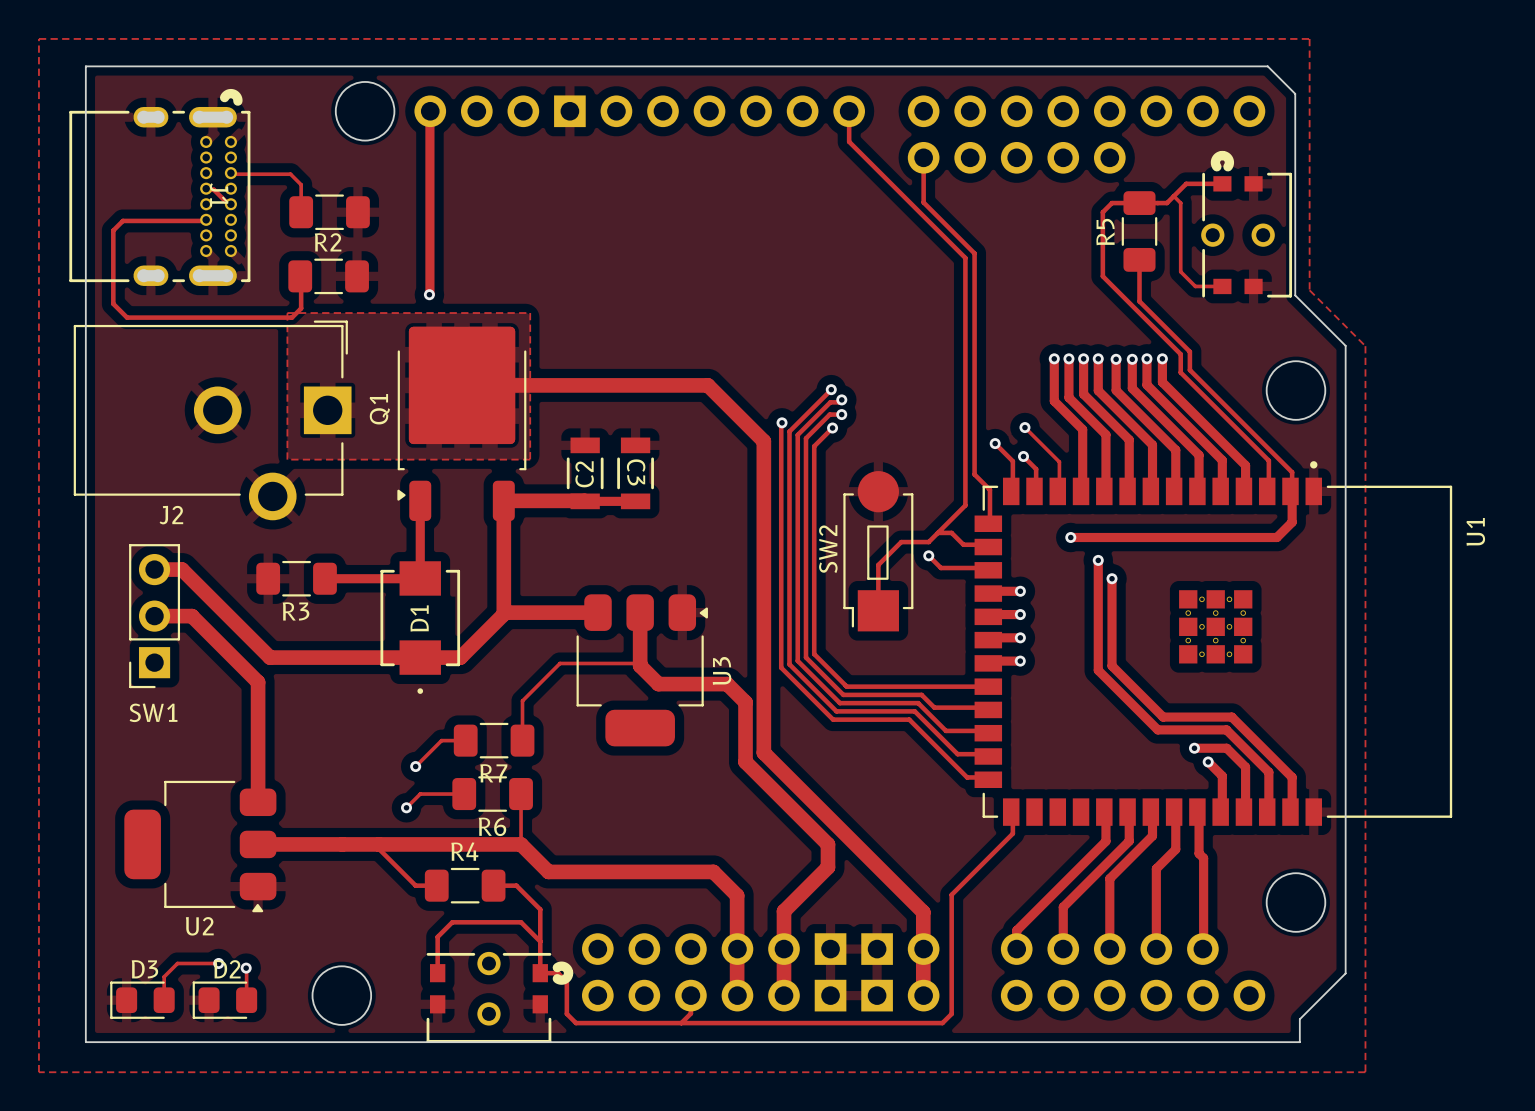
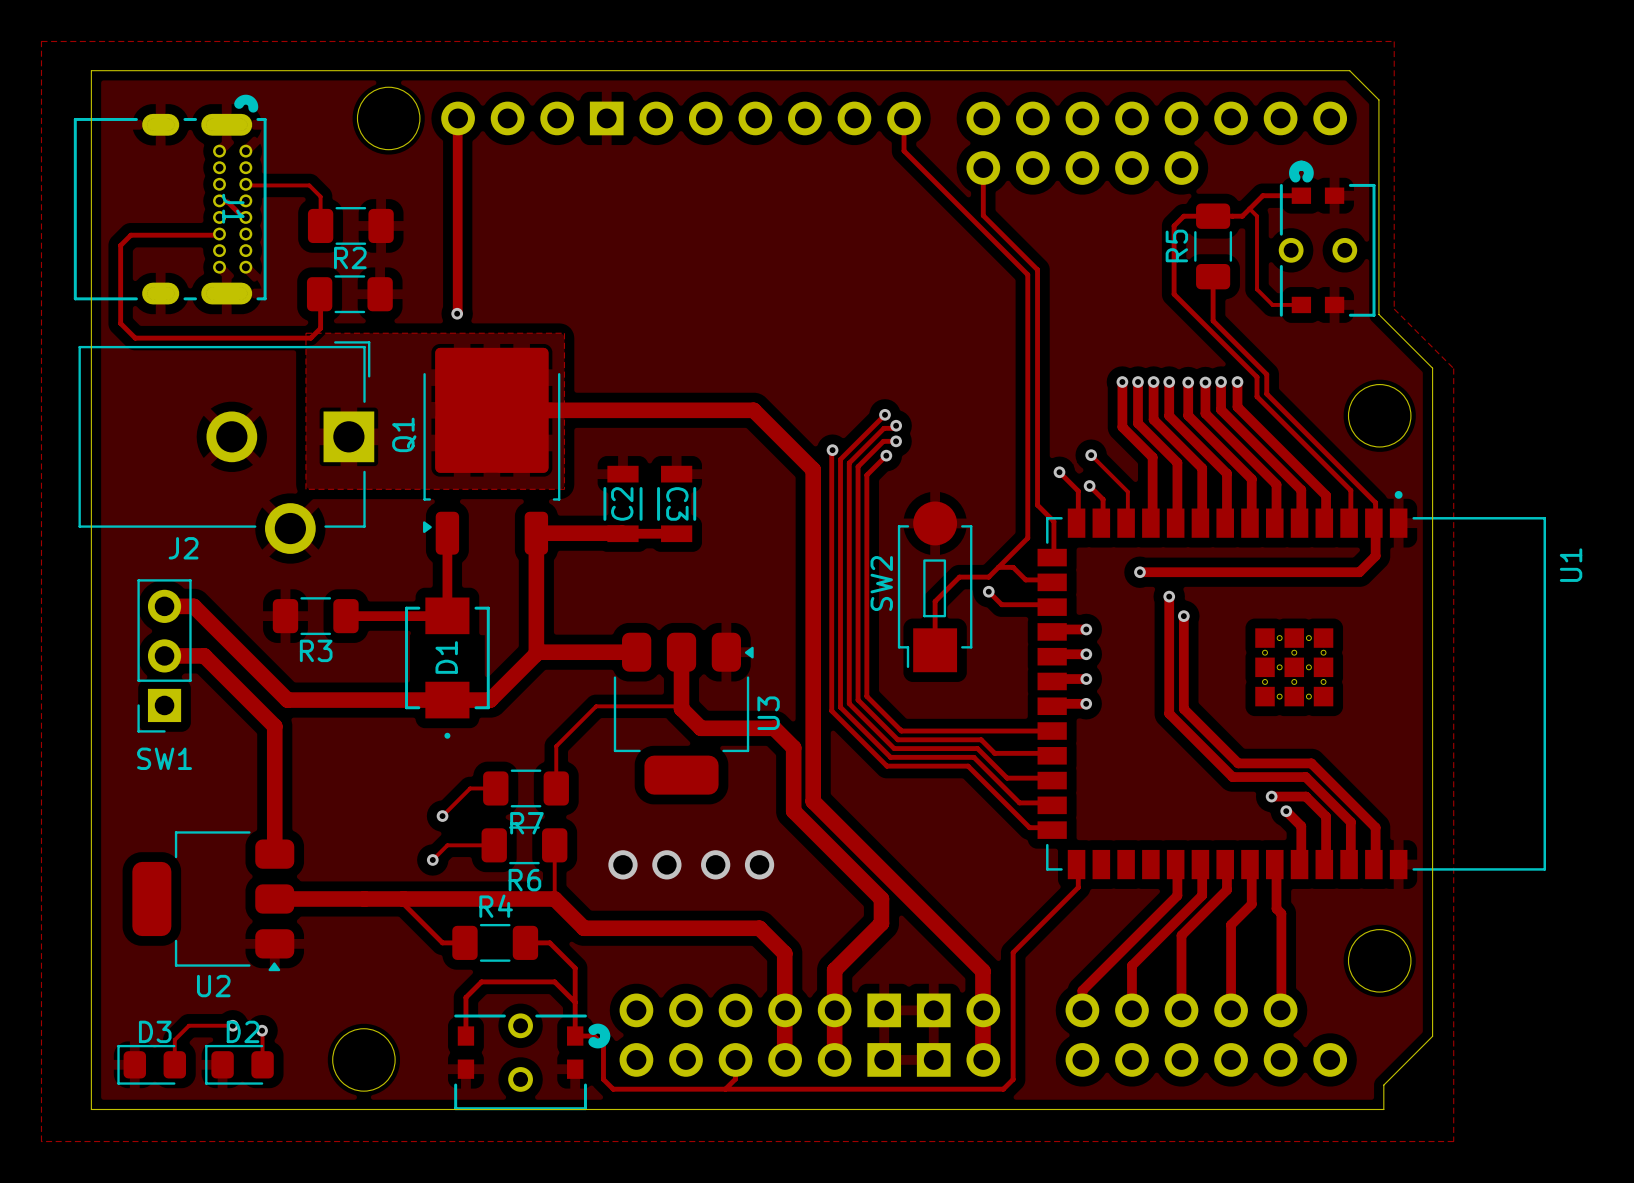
via: none -> (622, 864)
via: none -> (666, 864)
via: none -> (715, 864)
via: none -> (759, 864)

